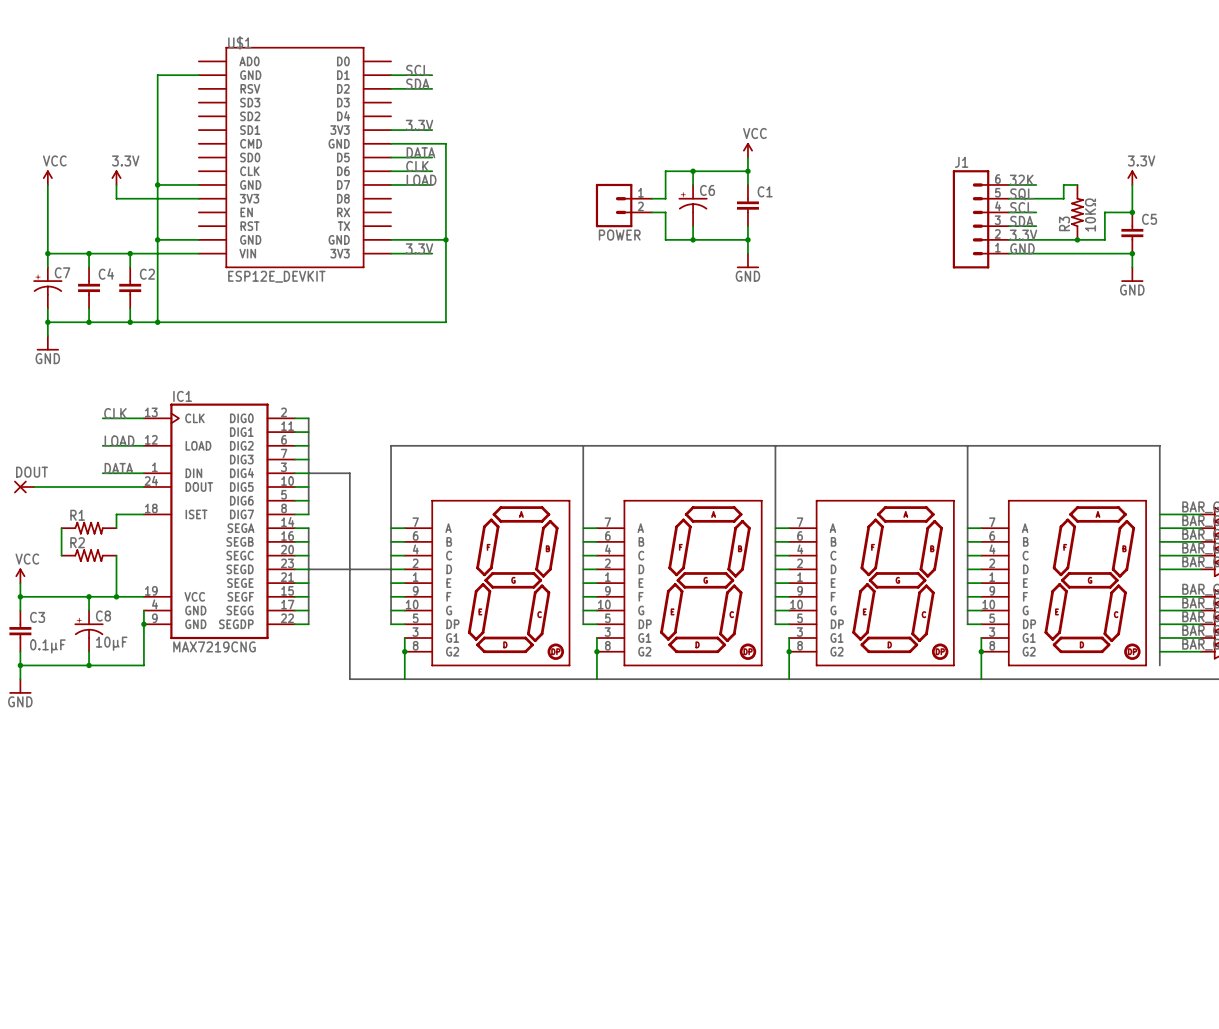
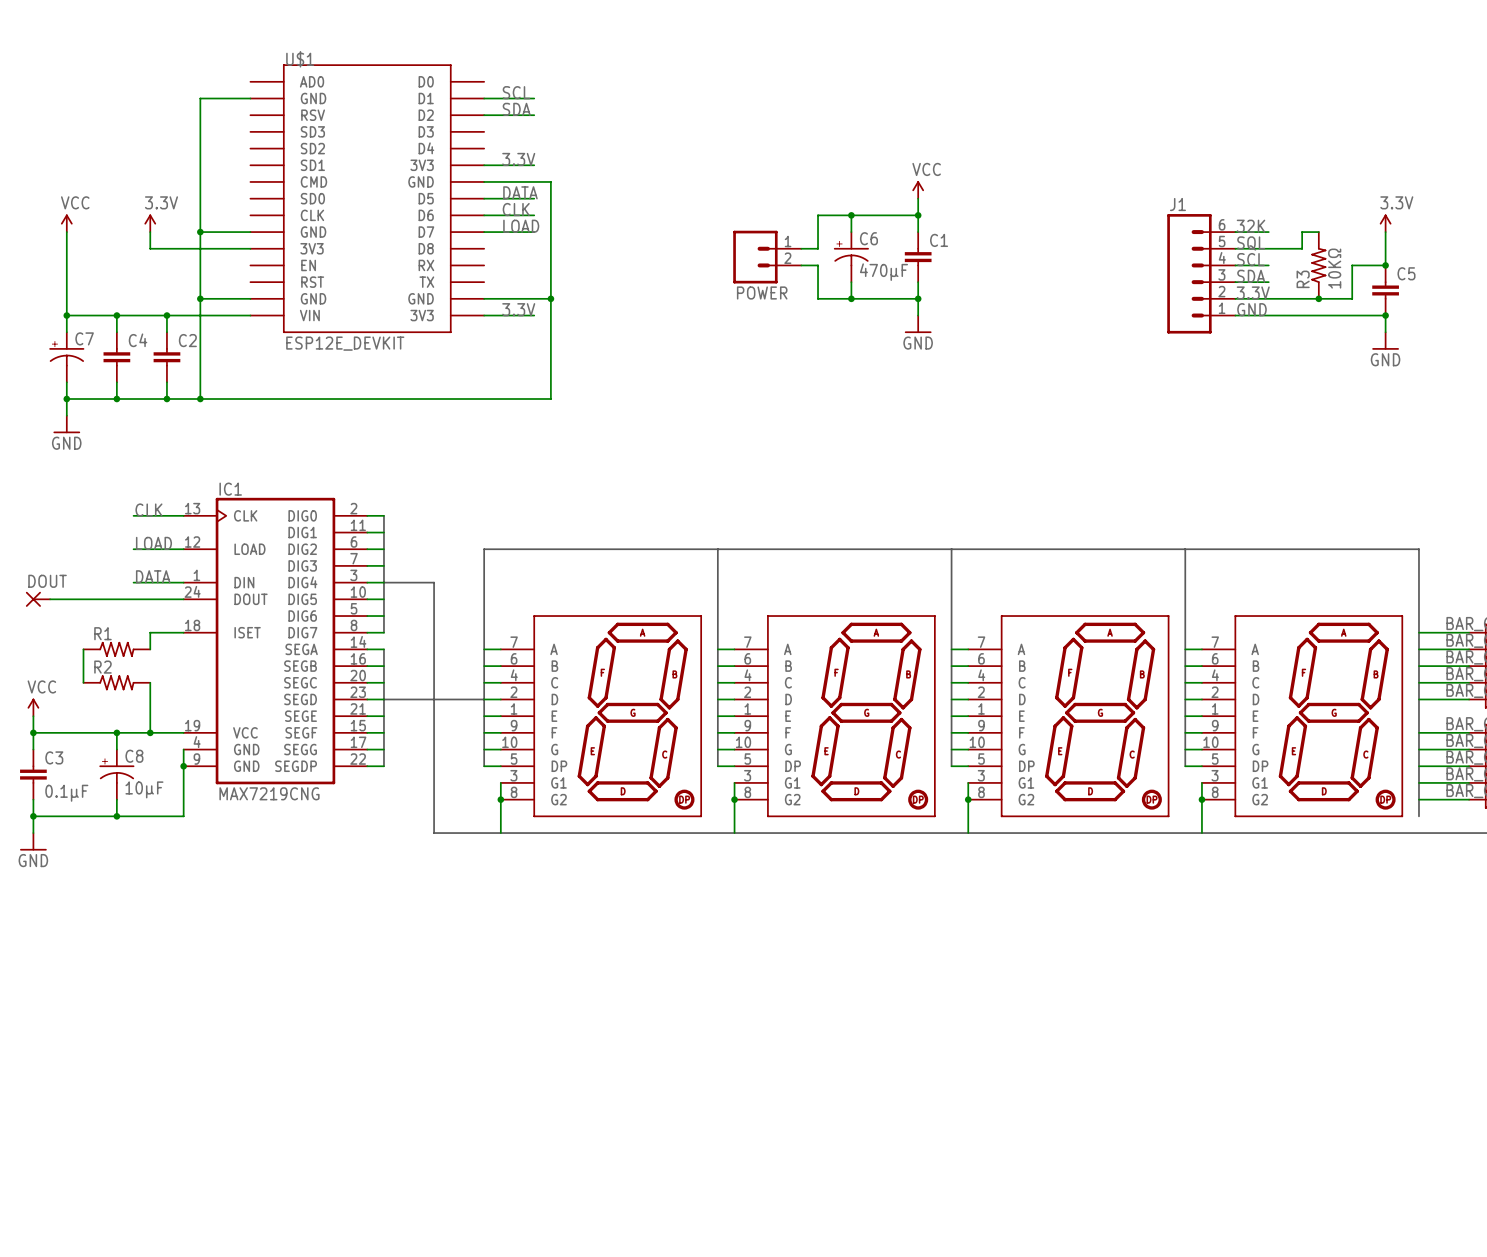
C6 value: none -> 470μF (883, 272)

